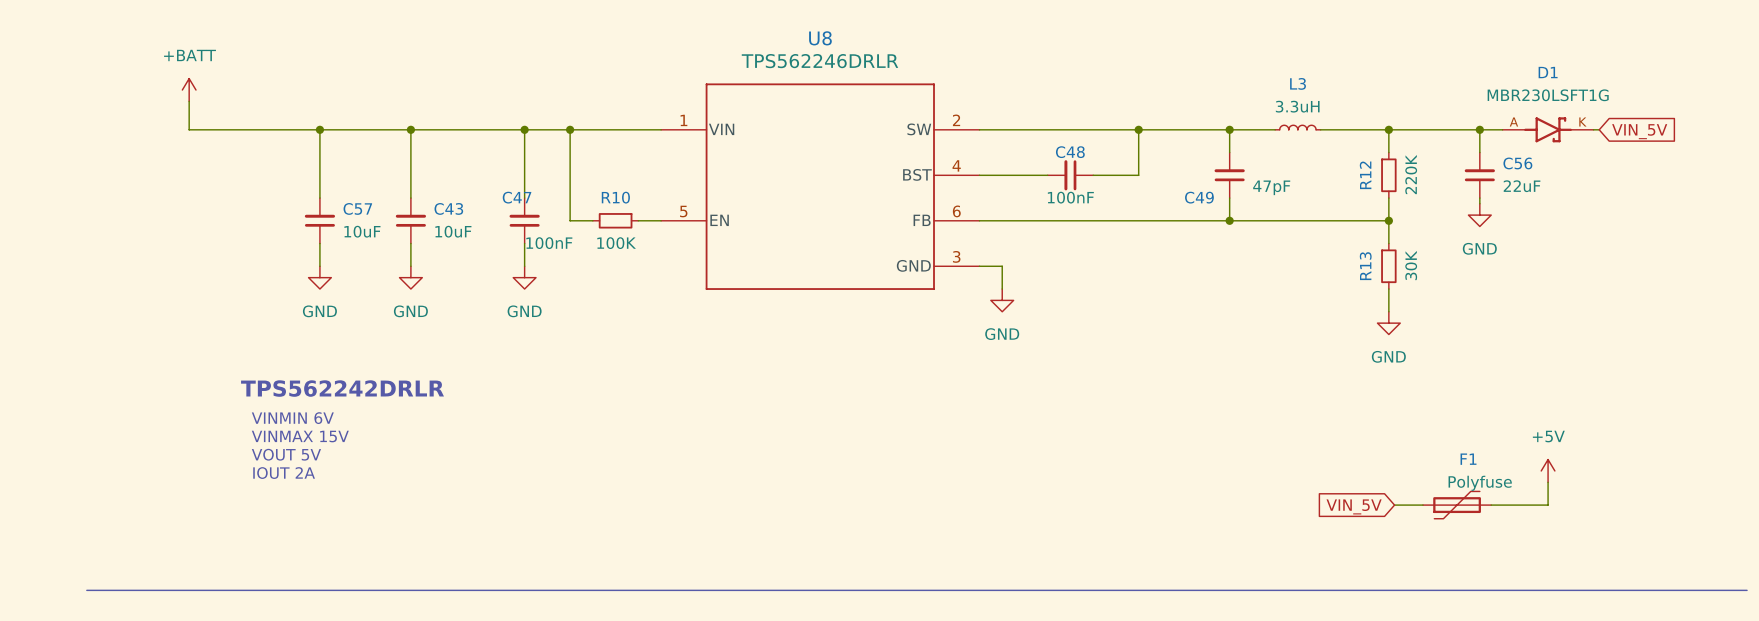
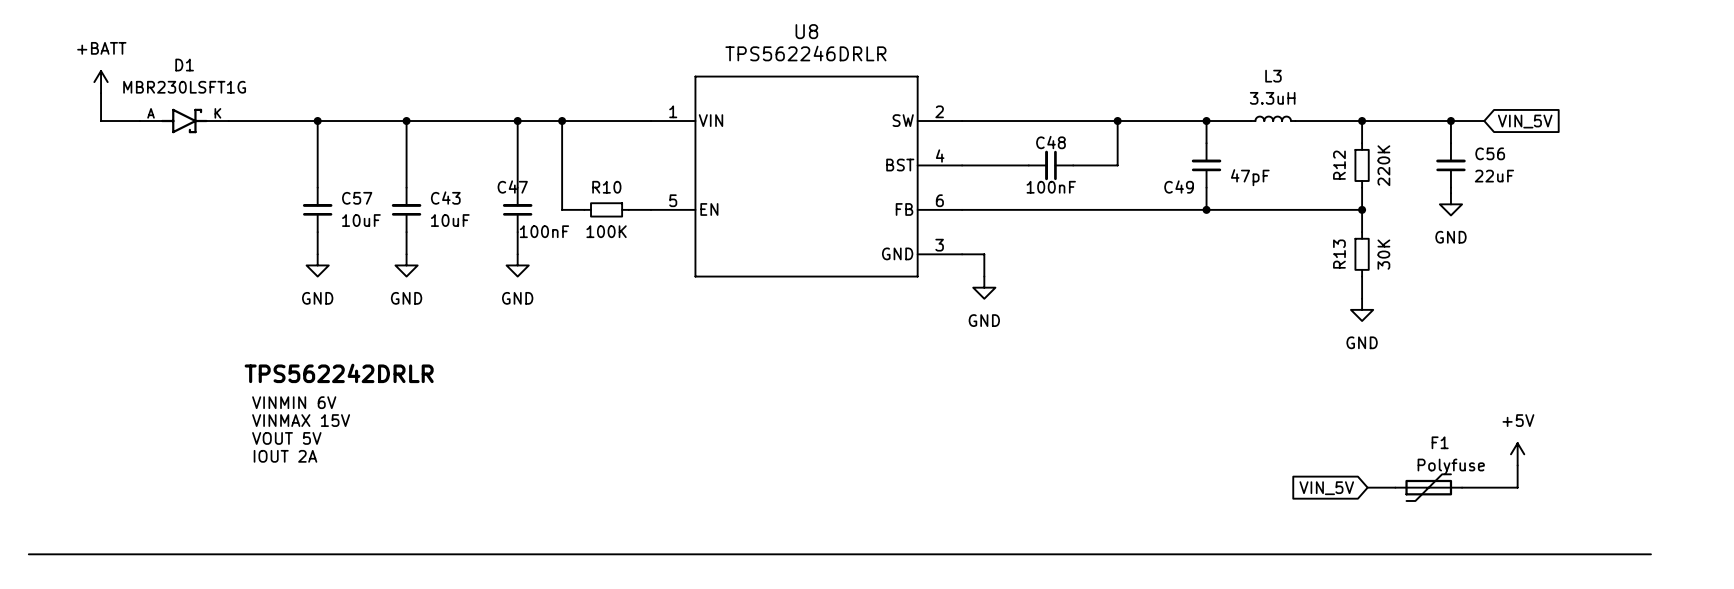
power symbol position: +BATT (189, 90) -> +BATT (101, 82)
wire: (189, 101) (189, 129) (228, 129) -> (101, 93) (101, 121) (139, 121)
D1 position: (1548, 129) -> (184, 121)
wire: (1593, 129) (1599, 129) -> none
global label position: VIN_5V (1639, 131) -> VIN_5V (1525, 121)
bus: (86, 590) (1747, 590) -> (28, 554) (1650, 554)

